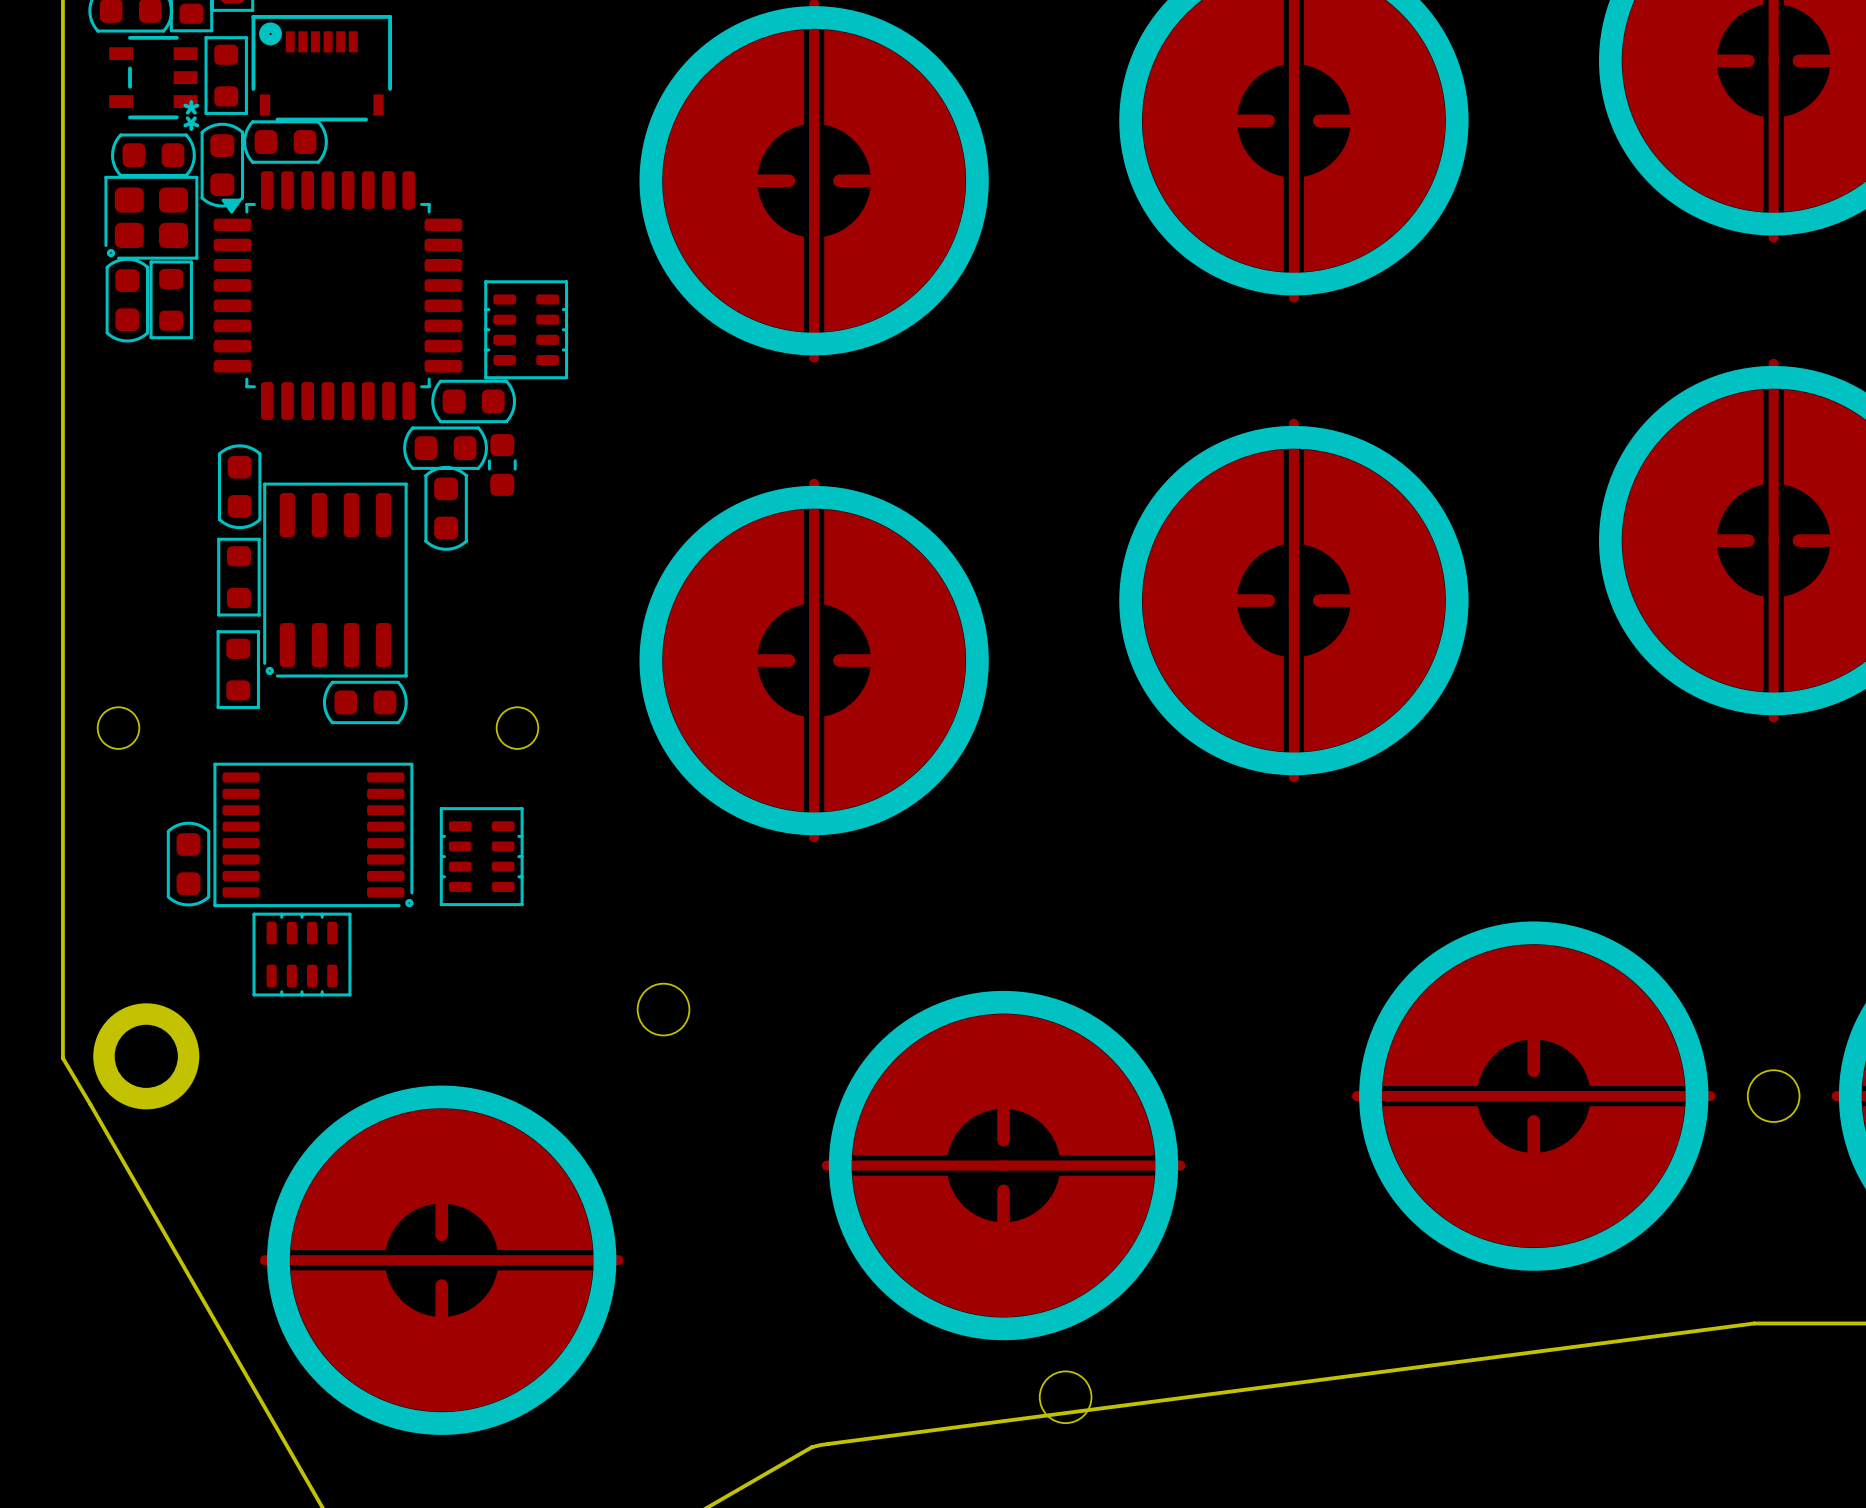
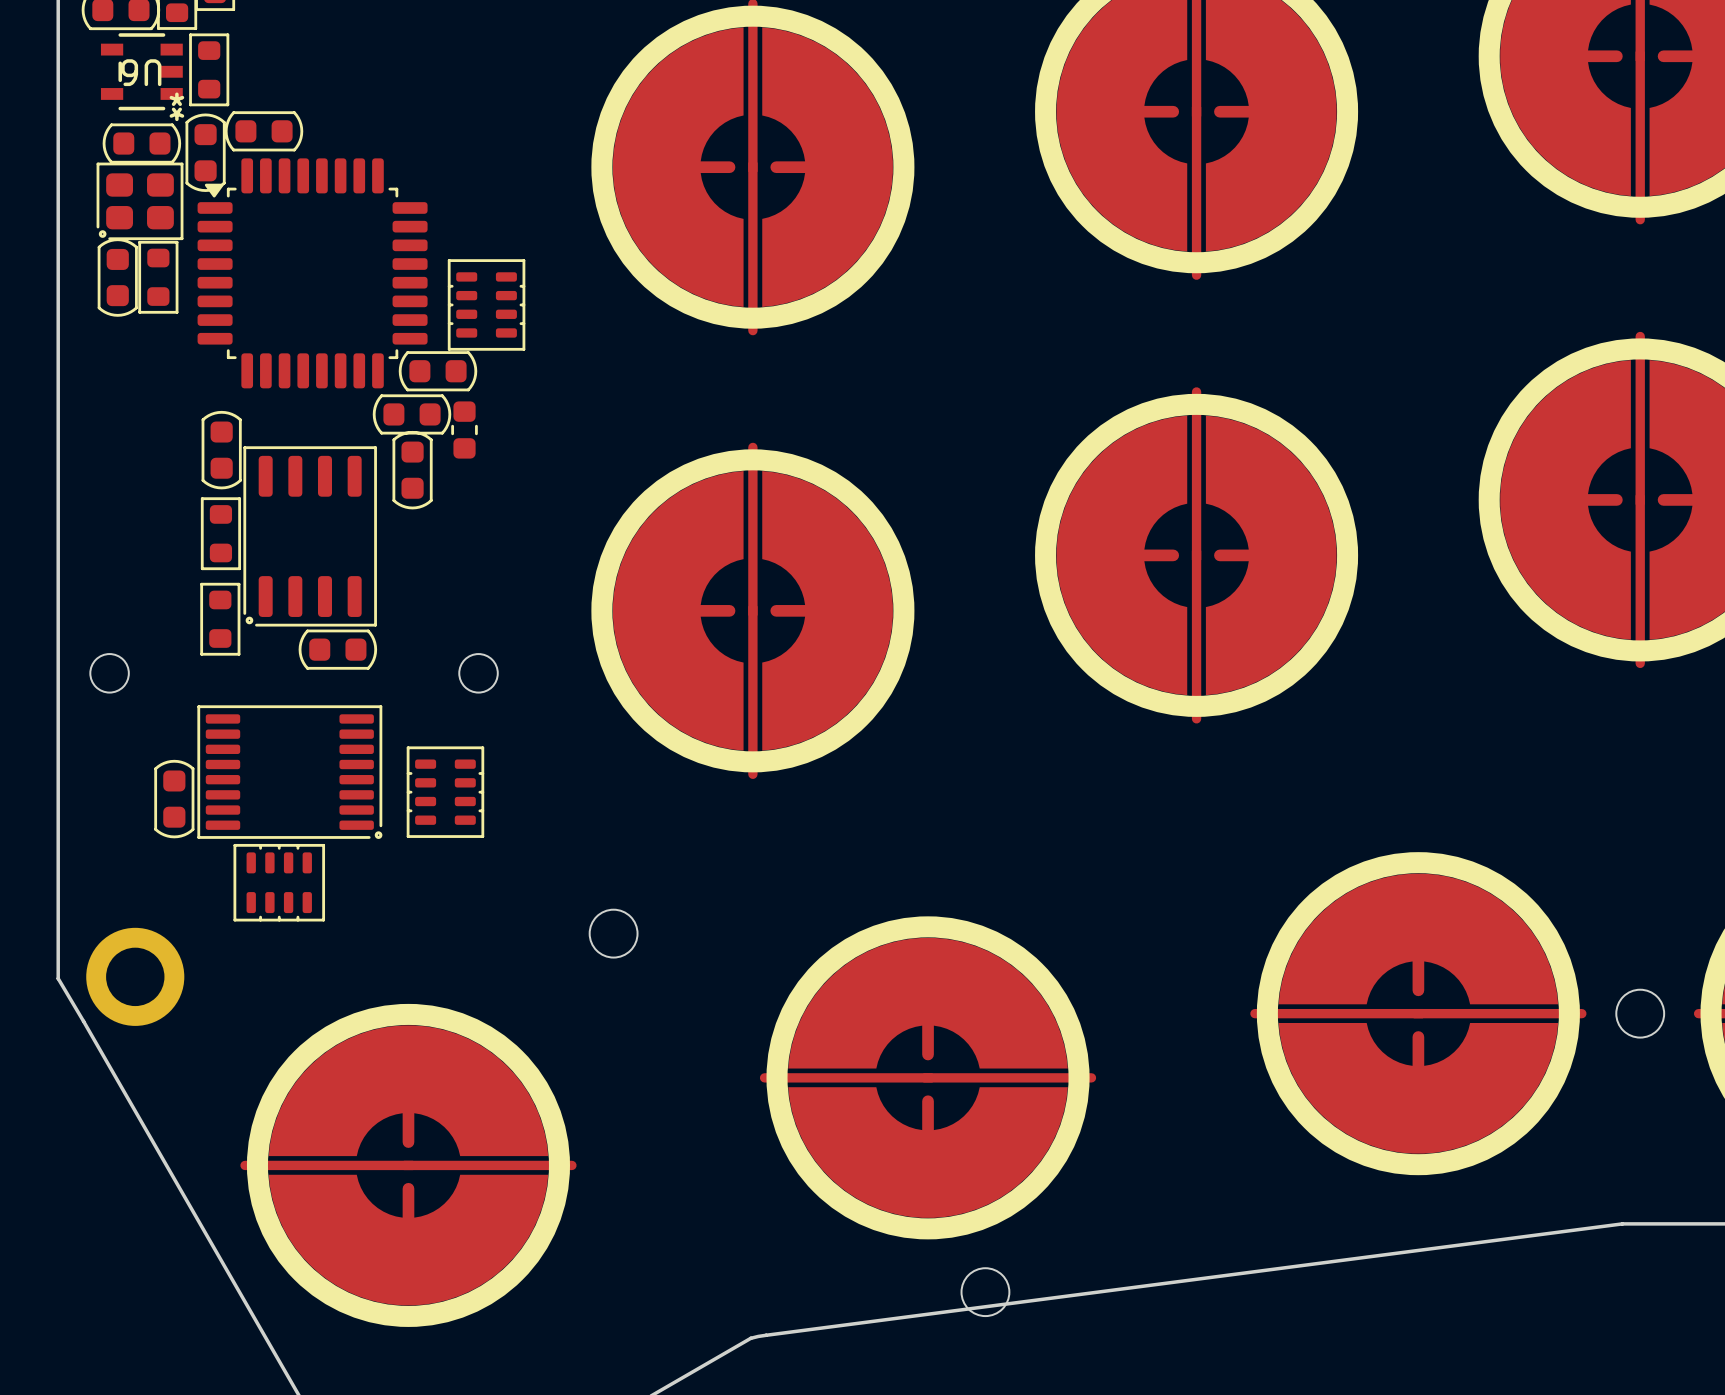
part: (321, 68) -> none
U6 name: none -> U6 (141, 72)

